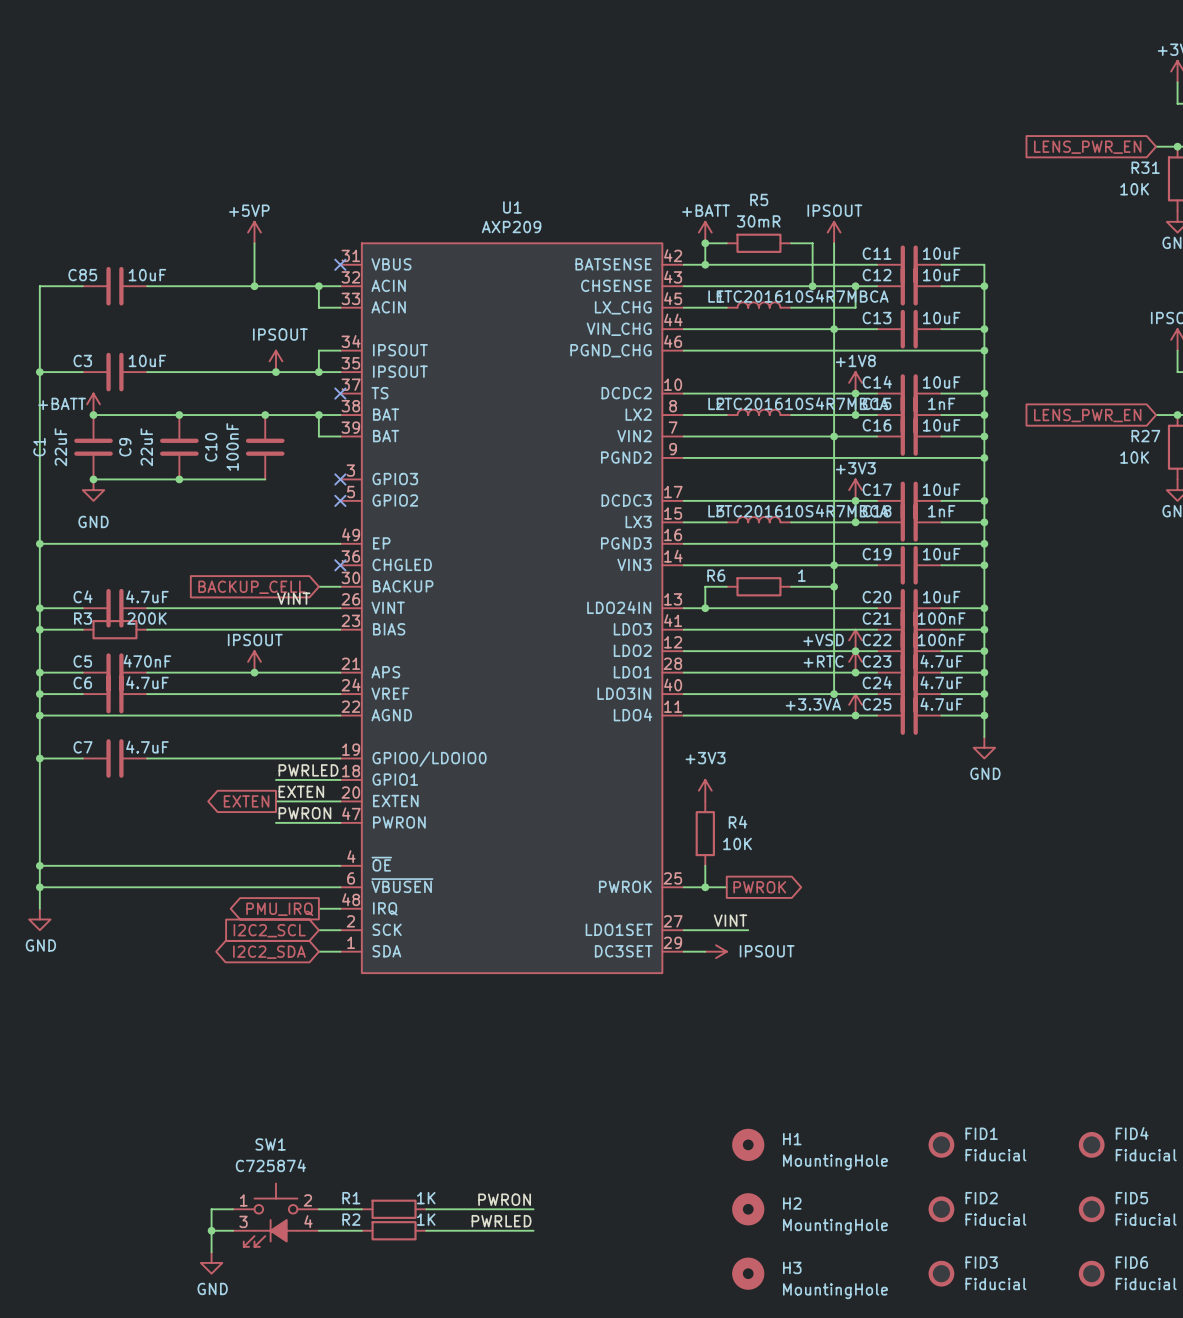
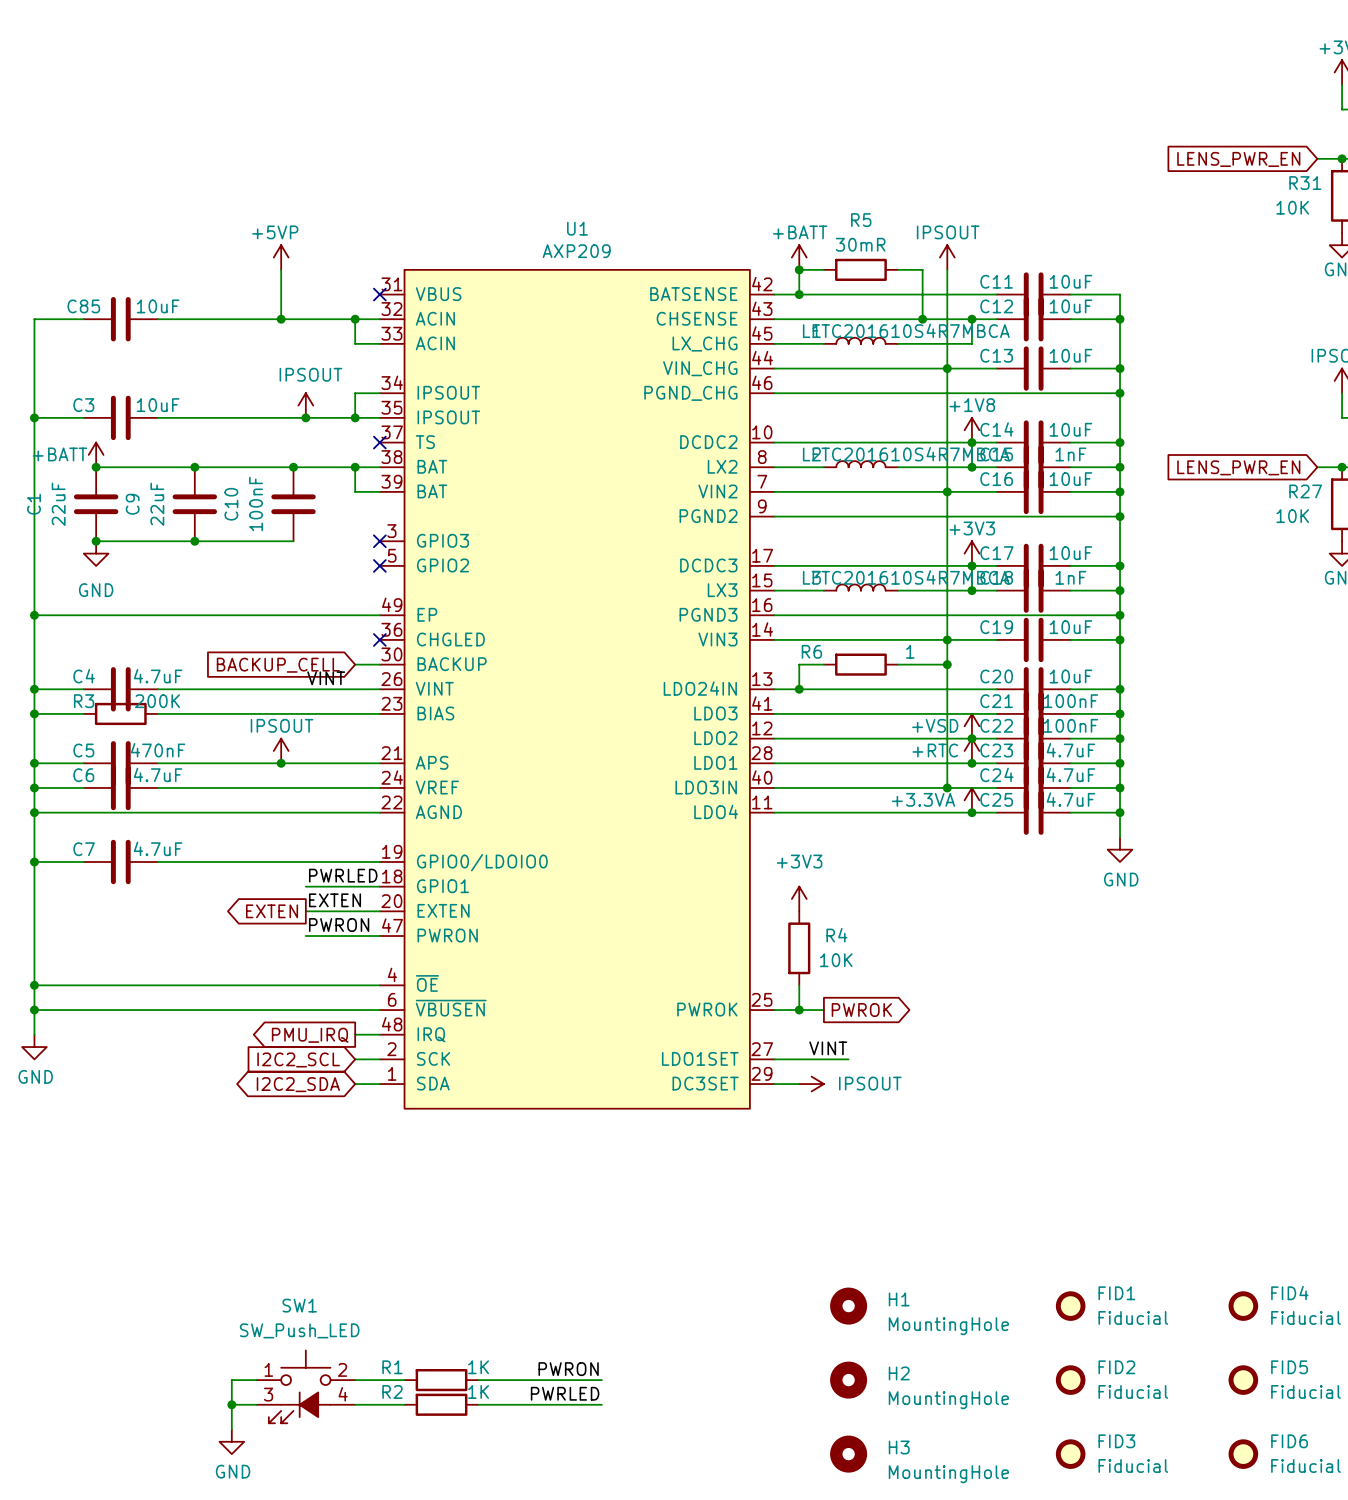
SW1 value: C725874 (270, 1165) -> SW_Push_LED (299, 1330)

